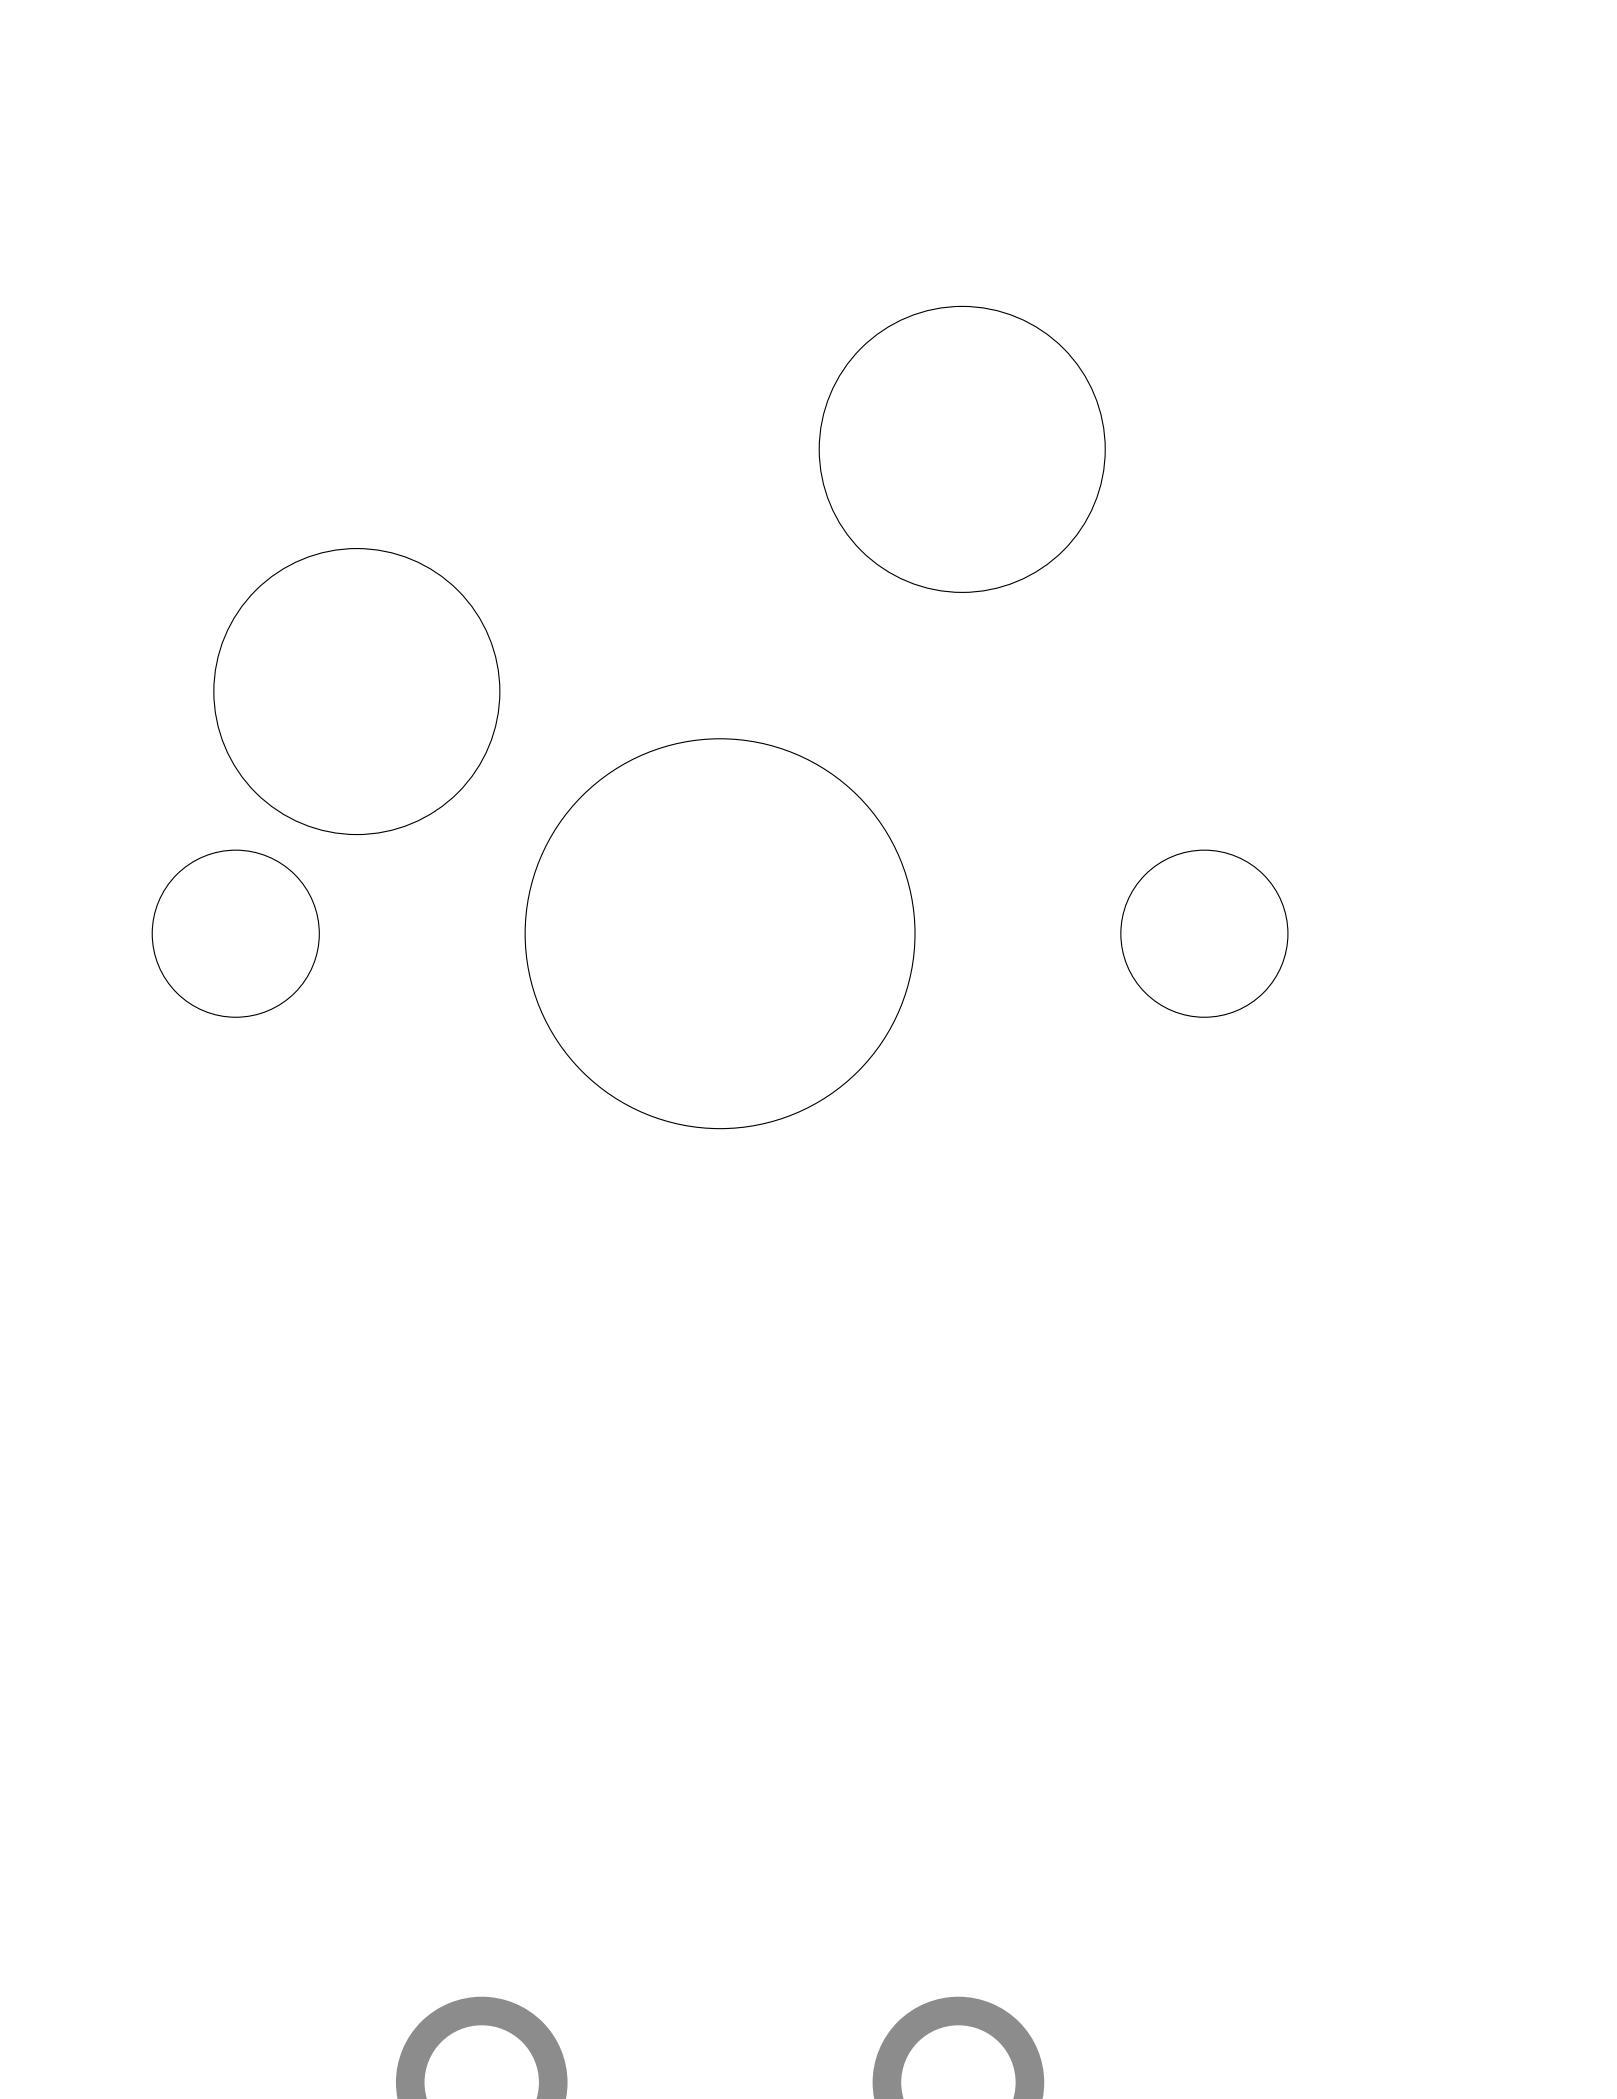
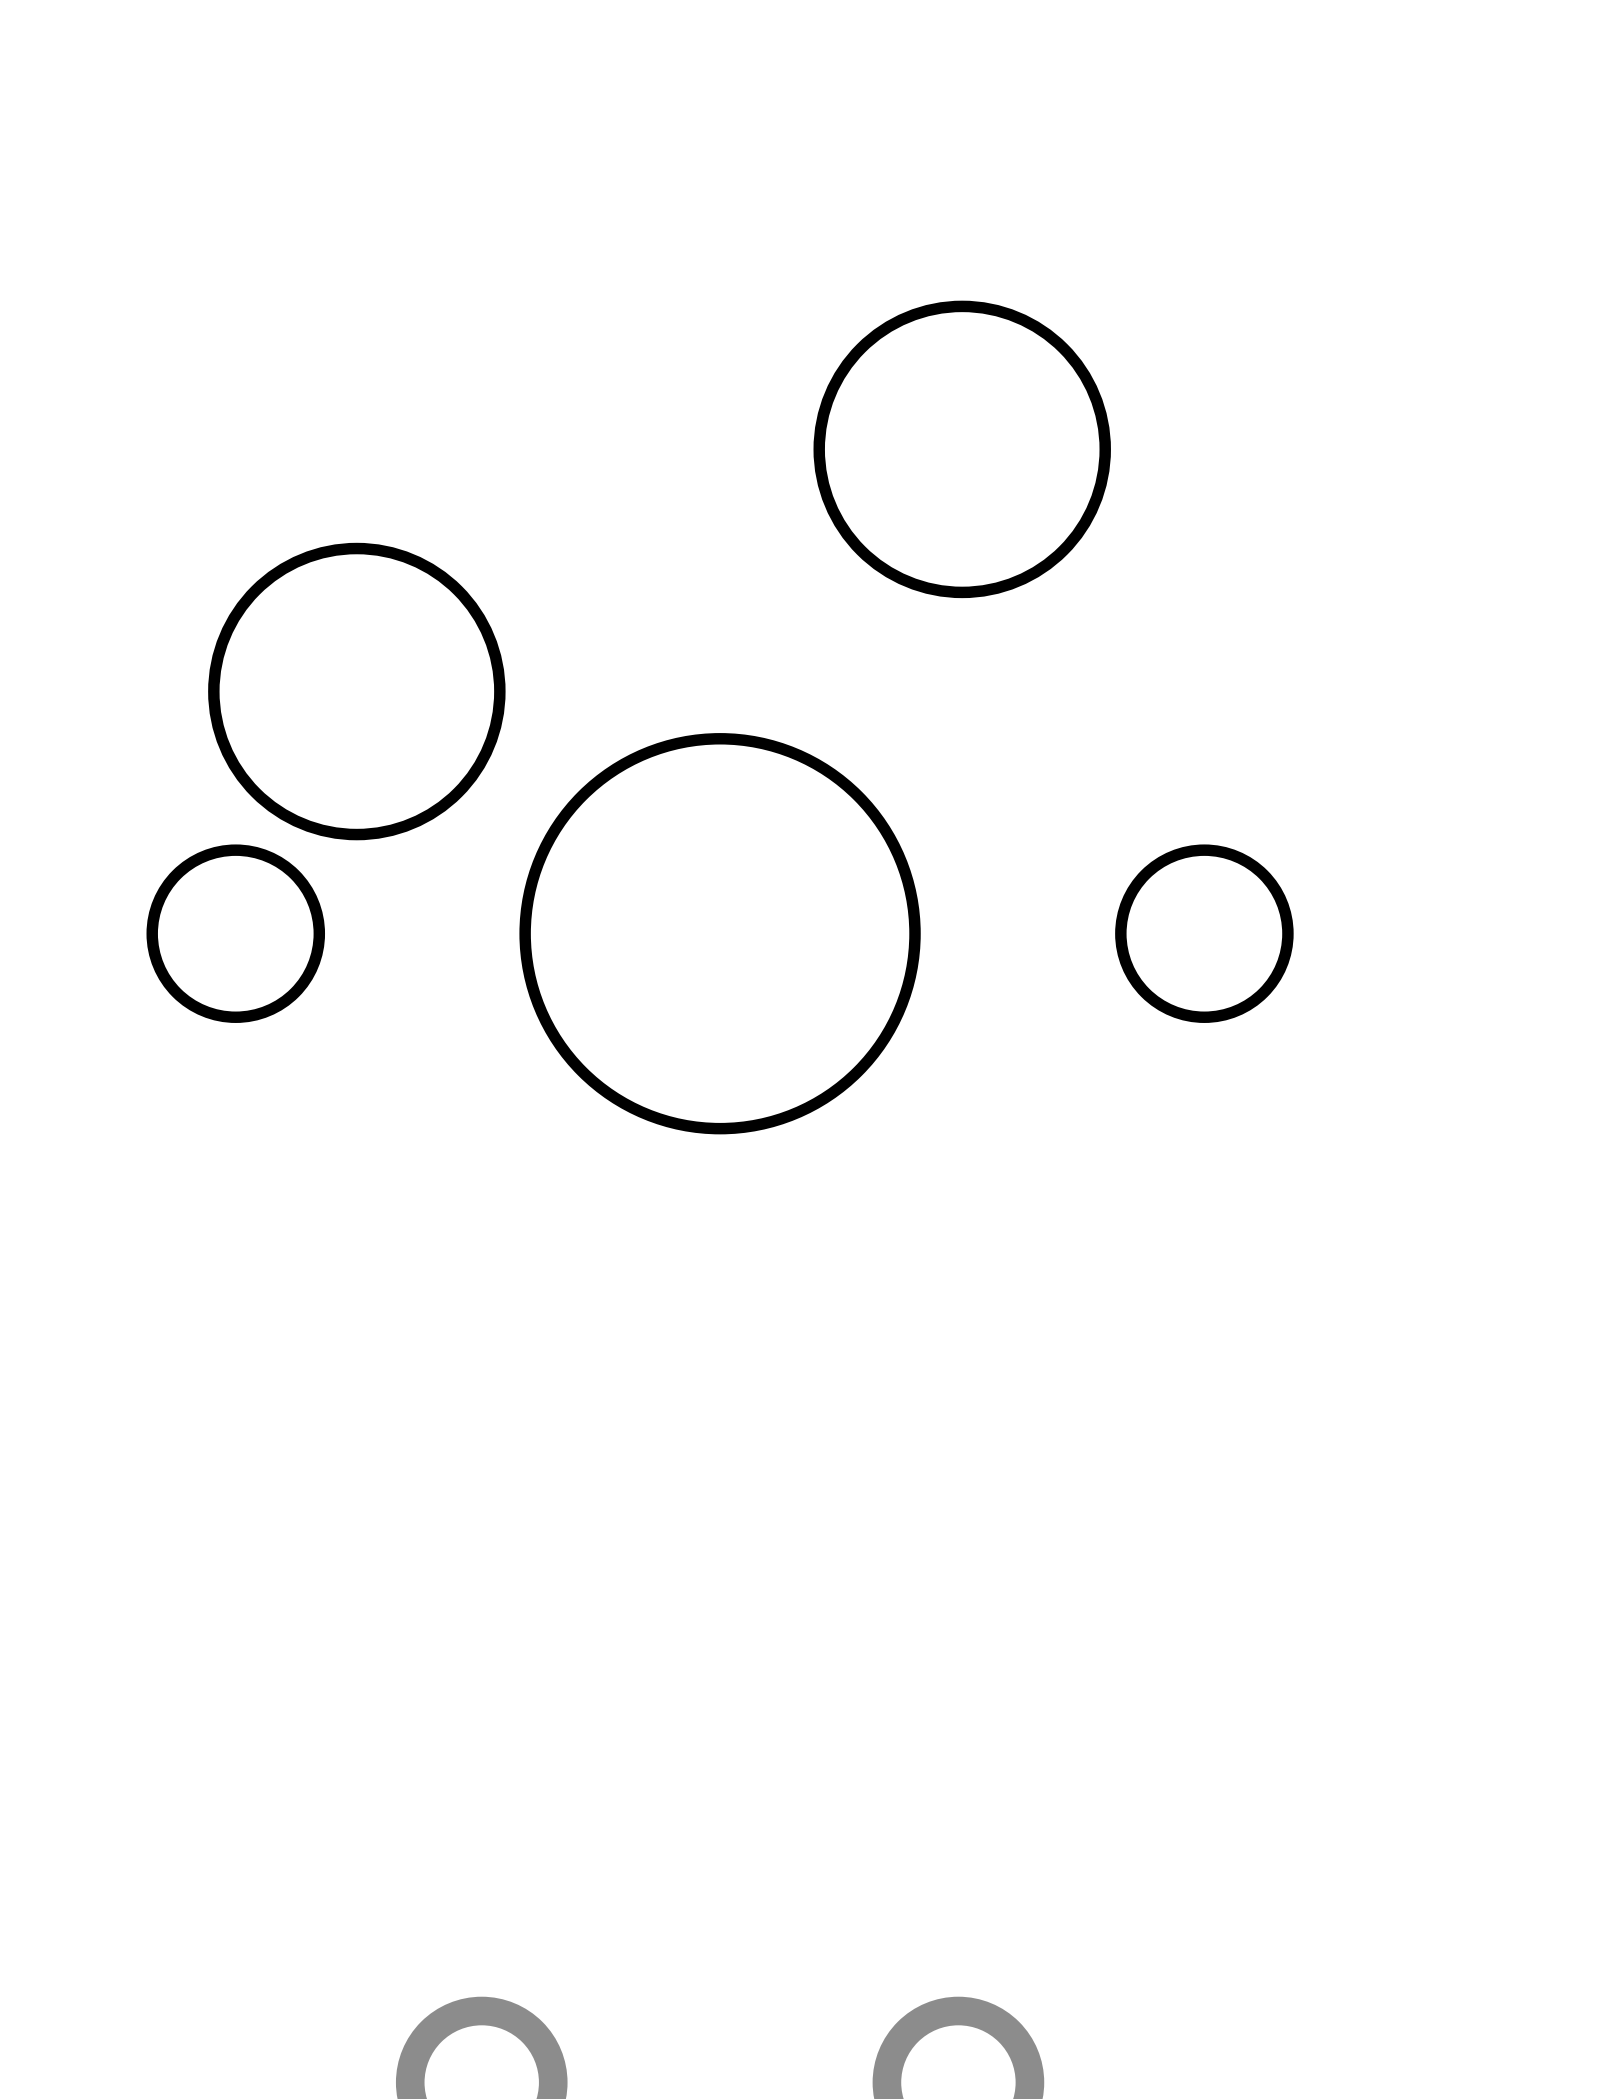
part footprint: [152, 306, 1288, 1129] -> [146, 300, 1294, 1135]

